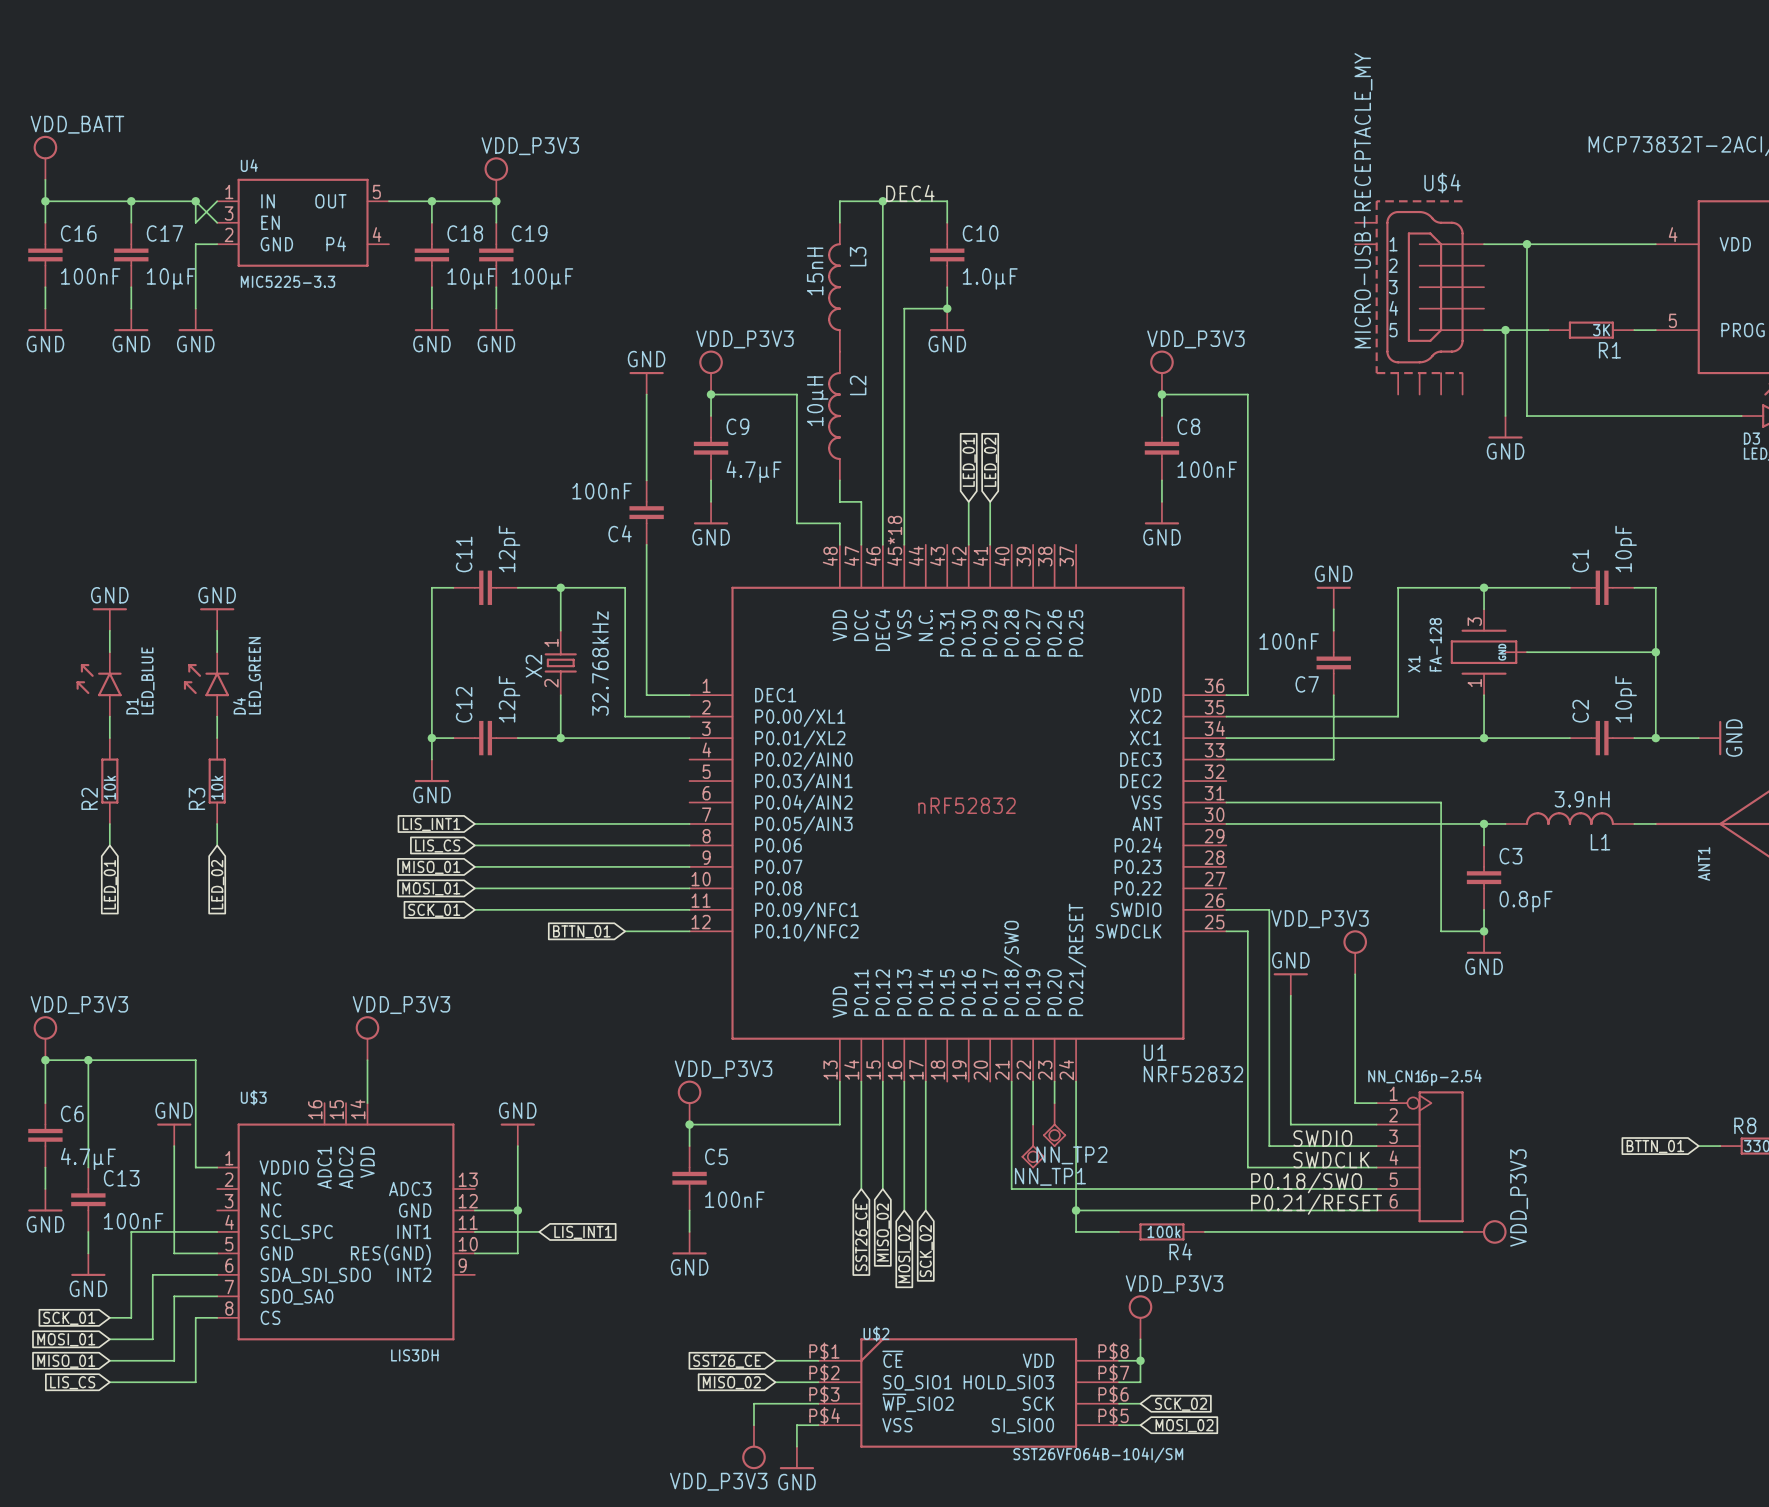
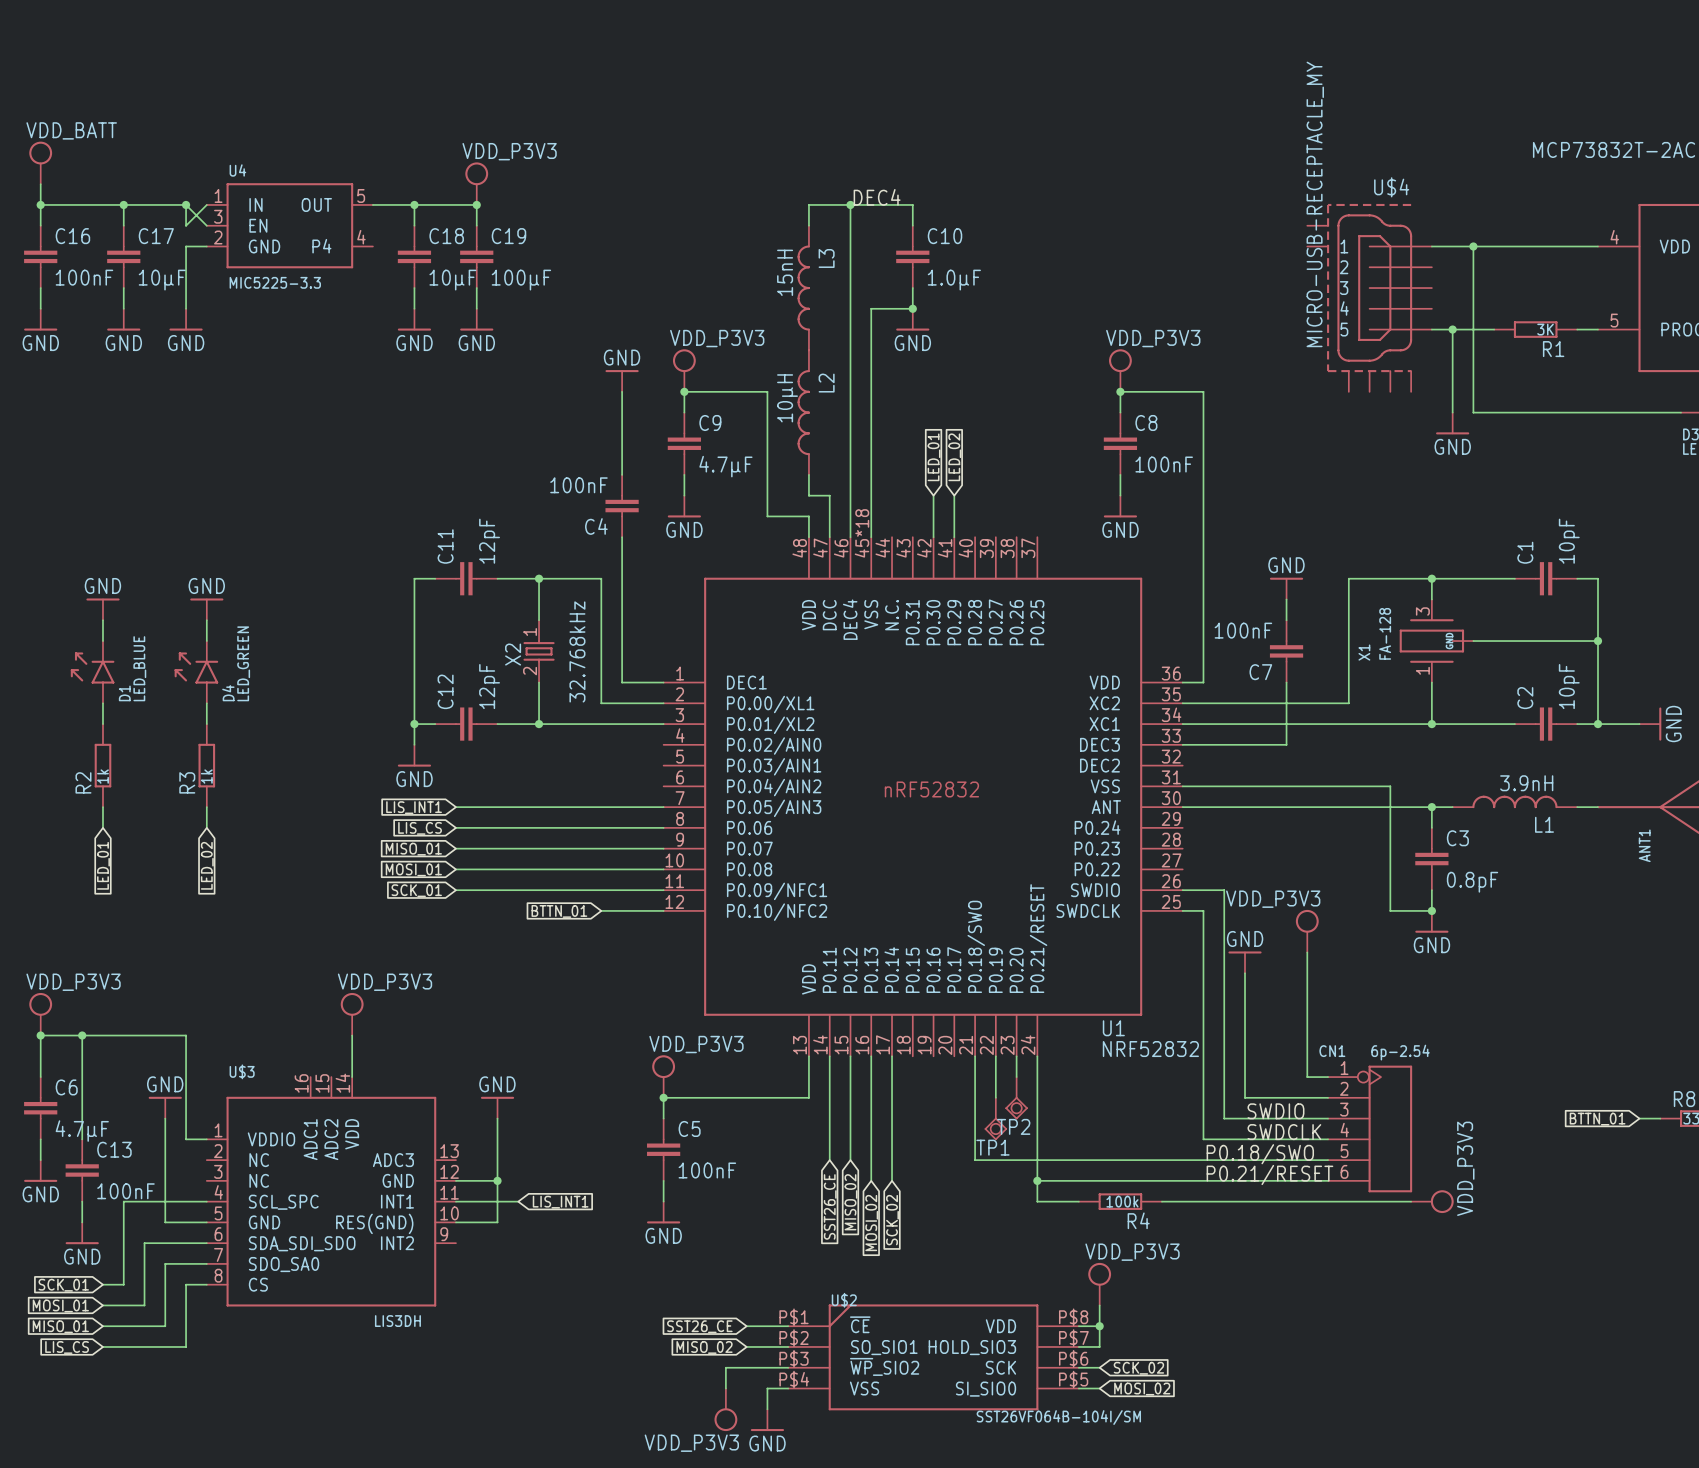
R2 value: 10k (109, 787) -> 1k (102, 776)
R3 value: 10k (217, 787) -> 1k (206, 776)
NN_CN1 name: NN_CN1 (1395, 1076) -> CN1 (1332, 1051)
NN_TP2 name: NN_TP2 (1071, 1155) -> TP2 (1013, 1126)
NN_TP1 name: NN_TP1 (1050, 1176) -> TP1 (992, 1147)

